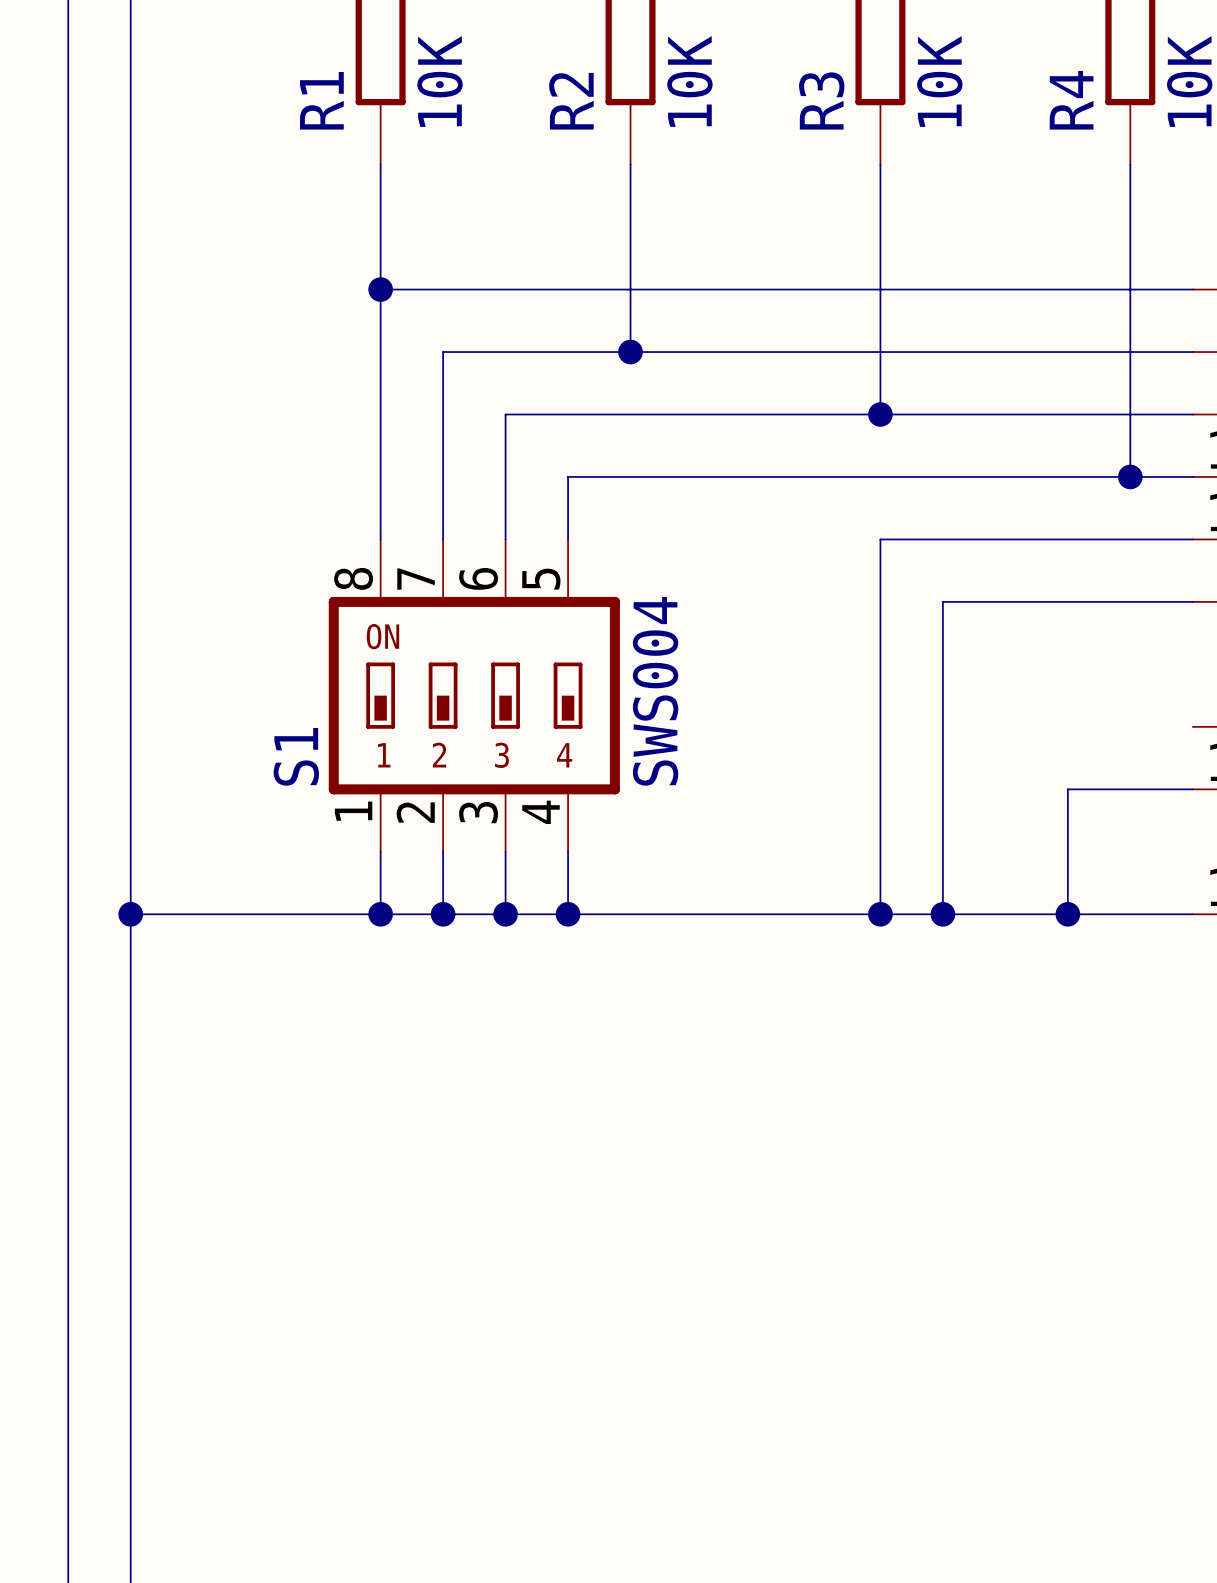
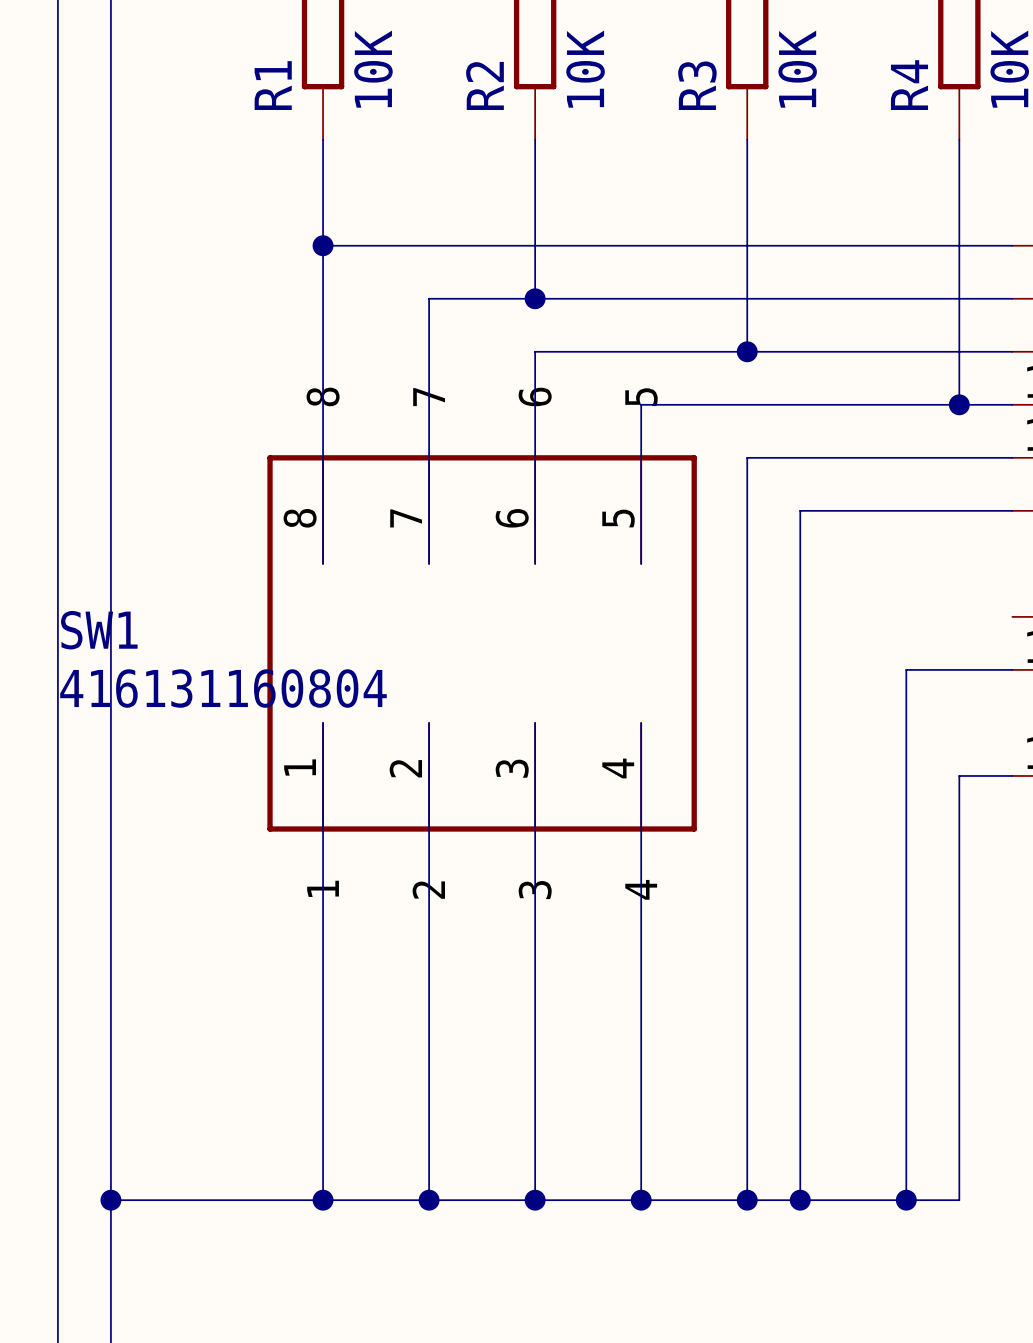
wire: (505, 352) (443, 352) (443, 539) -> none
wire: (505, 414) (630, 414) -> (429, 351) (429, 298)
wire: none -> (535, 351) (535, 563)
wire: (755, 476) (568, 476) (568, 539) -> (641, 404) (641, 563)
S1: SWS004 (474, 695) -> none
SW1: none -> 416131160804 (482, 643)
wire: (443, 851) (443, 914) -> none
wire: (568, 851) (568, 914) -> none
wire: none -> (535, 722) (535, 1200)
wire: none -> (641, 722) (641, 1200)
wire: (130, 914) (1130, 914) -> (110, 1200) (959, 1200) (959, 775)
junction: (130, 914) -> none
wire: none -> (323, 775) (323, 1200)
junction: (380, 914) -> none
junction: (443, 914) -> none
wire: none -> (429, 775) (429, 1200)
junction: (505, 914) -> none
junction: (568, 914) -> none
wire: none -> (747, 775) (747, 1200)
junction: (880, 914) -> none
wire: none -> (800, 775) (800, 1200)
junction: (942, 914) -> none
wire: none -> (906, 775) (906, 1200)
junction: (1067, 914) -> none
junction: none -> (110, 1200)
junction: none -> (323, 1200)
junction: none -> (429, 1200)
junction: none -> (535, 1200)
junction: none -> (641, 1200)
junction: none -> (747, 1200)
junction: none -> (800, 1200)
junction: none -> (906, 1200)

